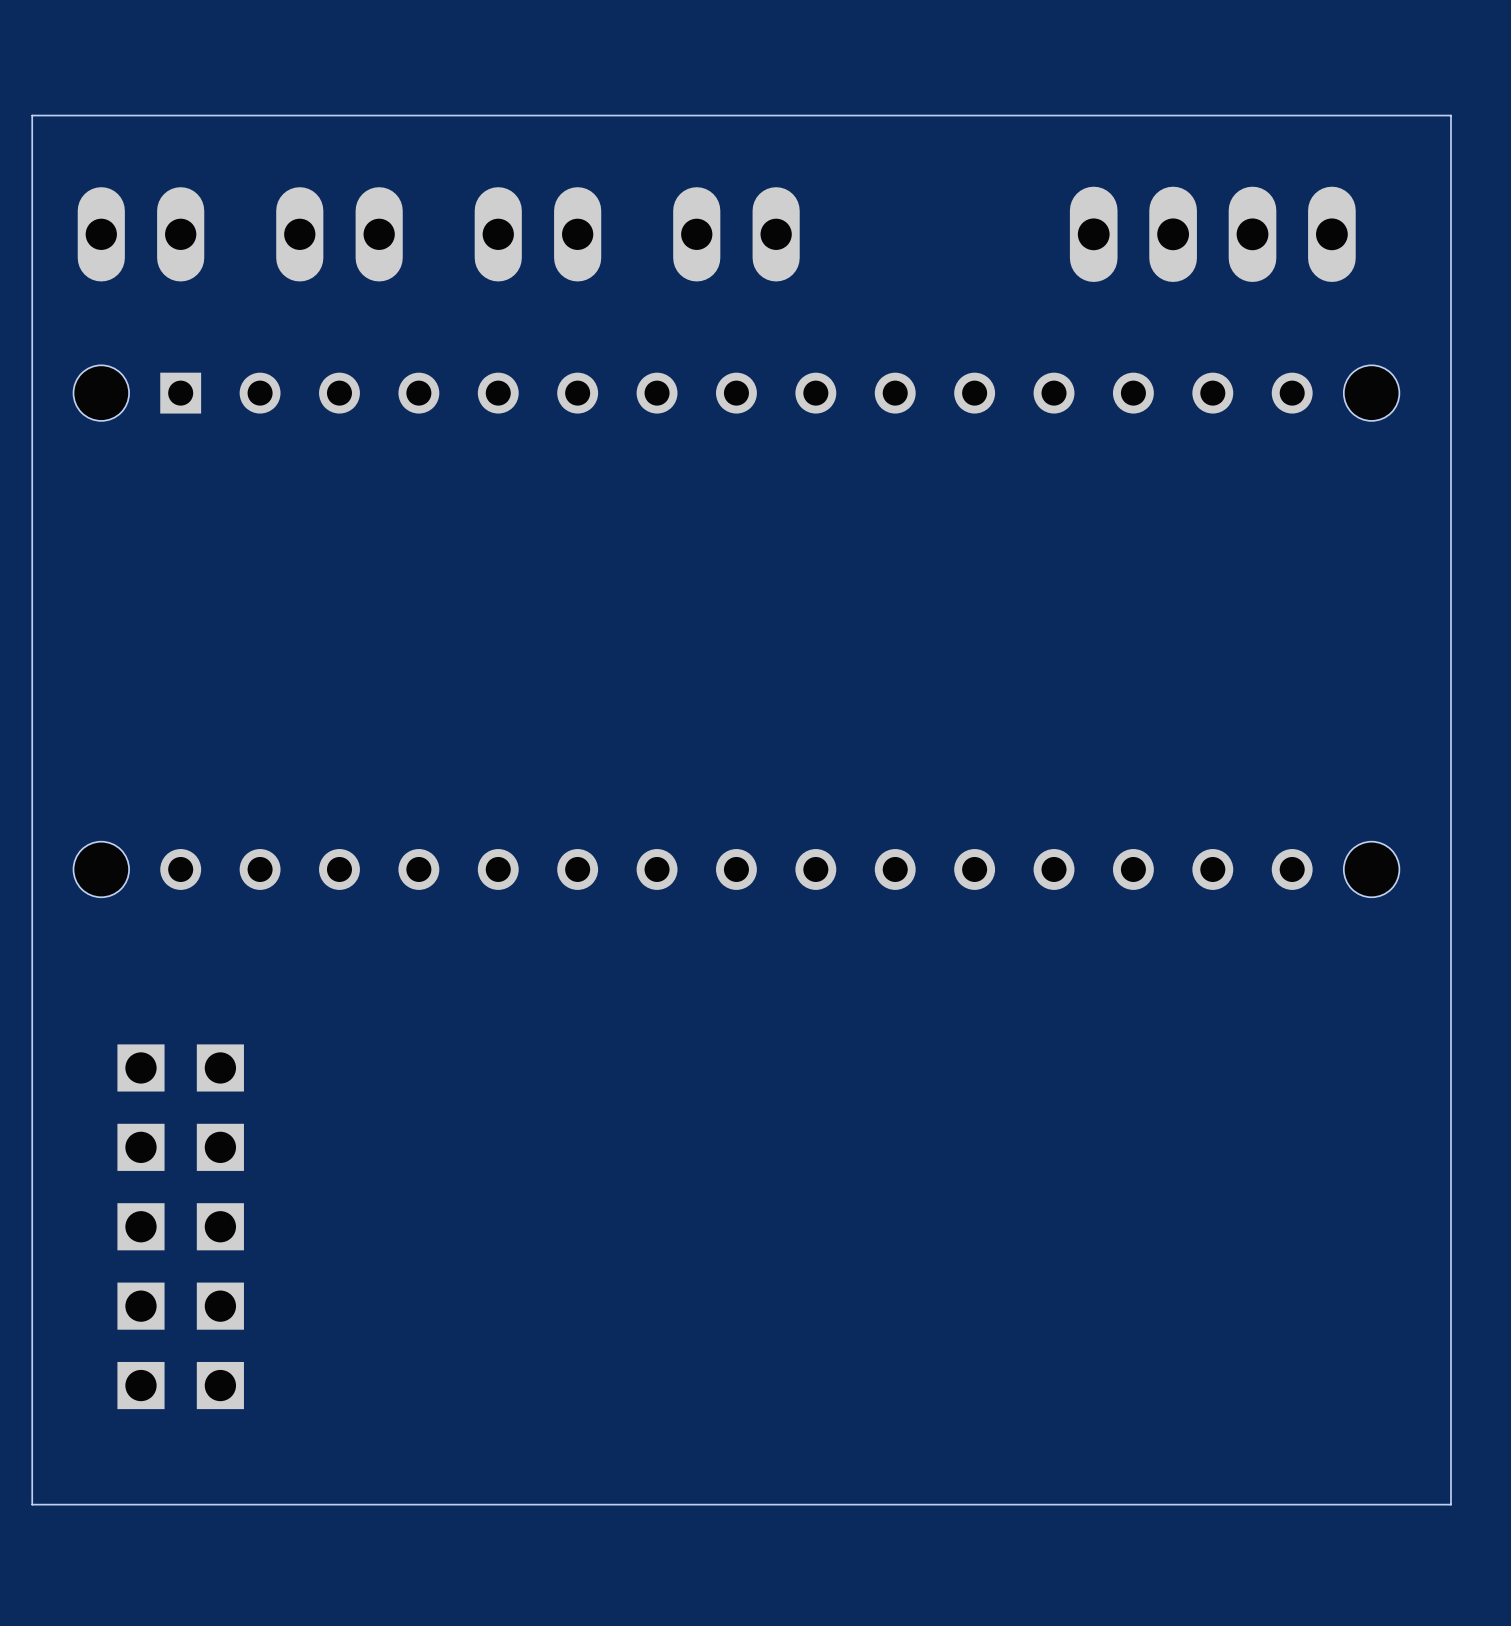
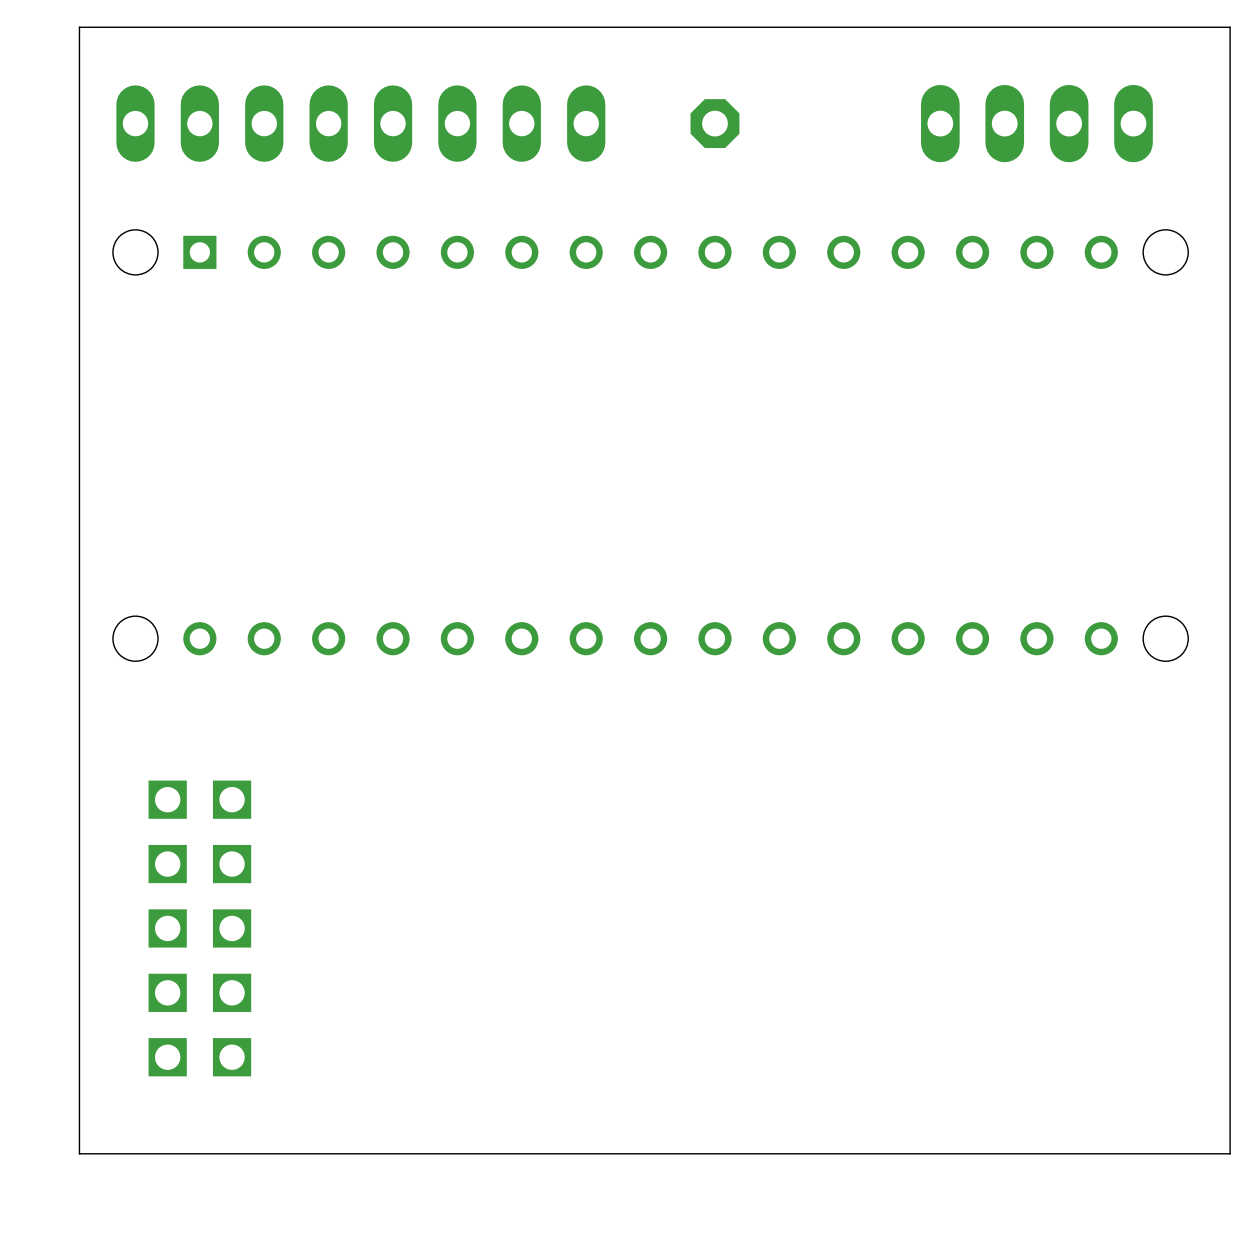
part position: (339, 234) -> (296, 123)
part: none -> (425, 123)
part: none -> (554, 123)
part: (736, 234) -> none
part: none -> (714, 123)

